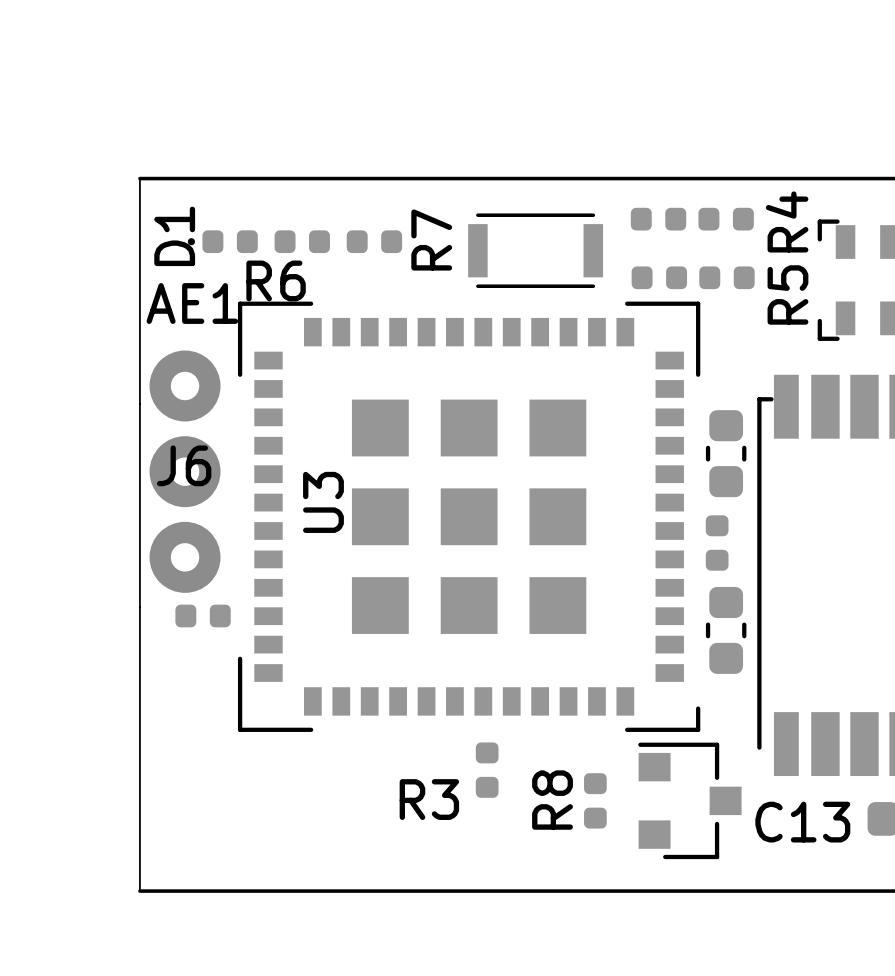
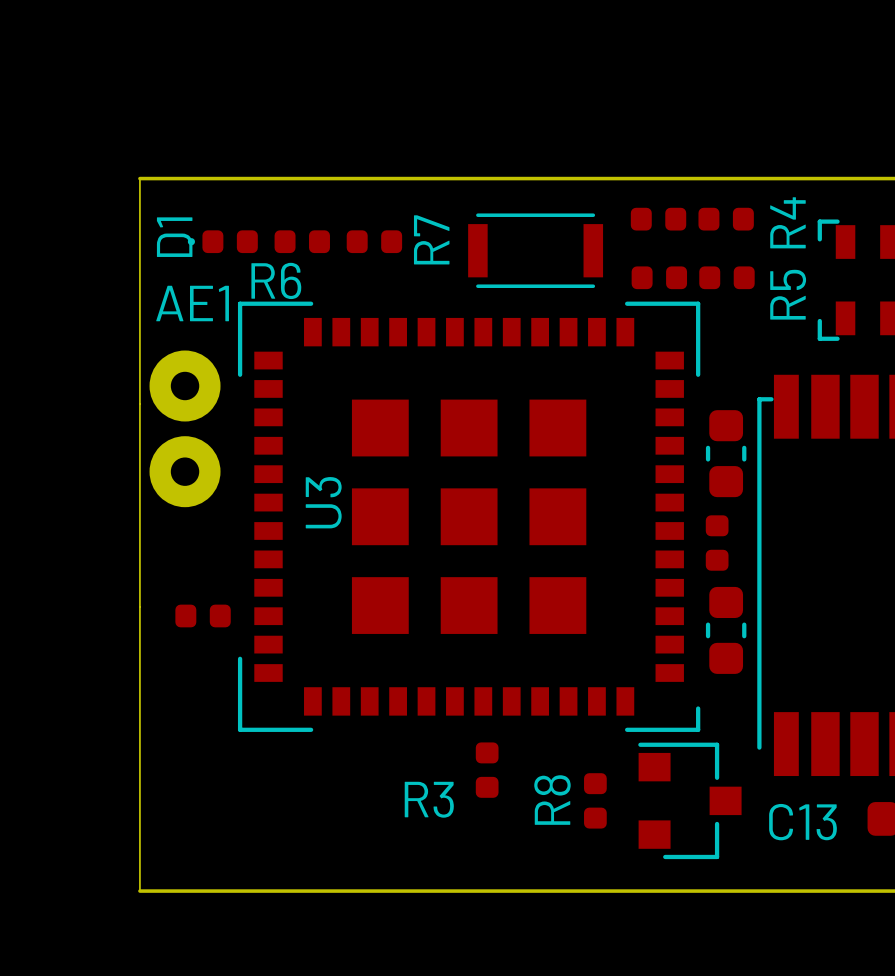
J6: (185, 557) -> none

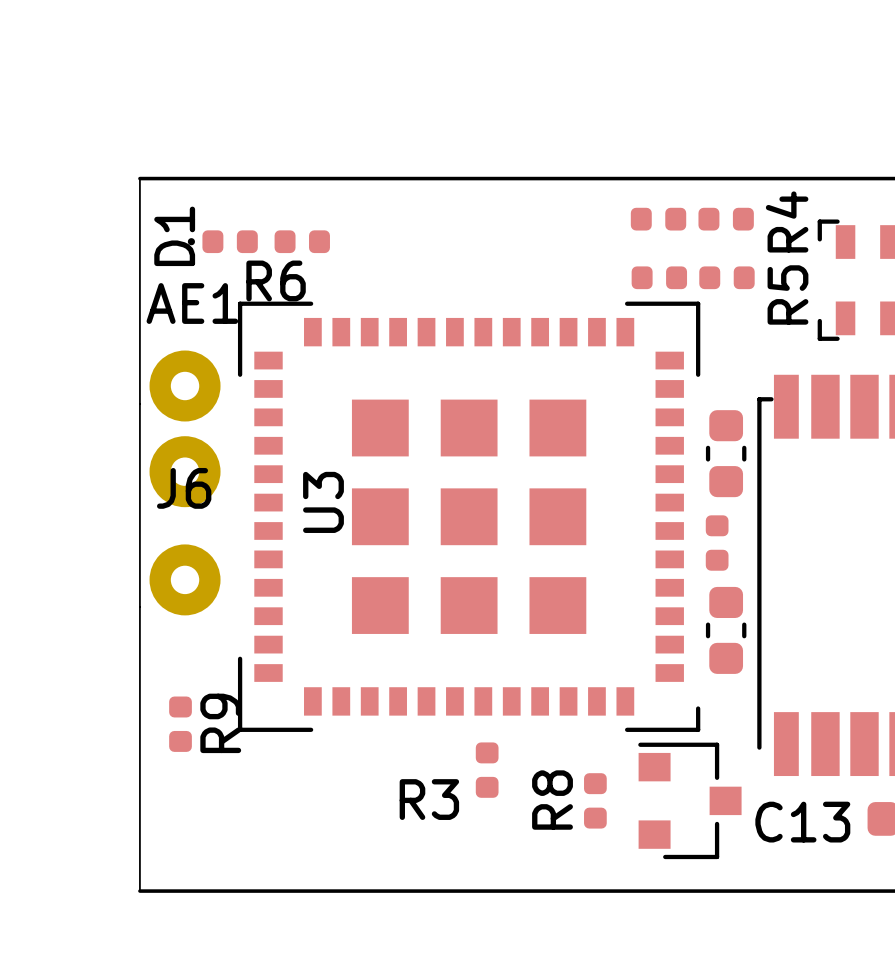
R7: (374, 241) -> none
part: (535, 250) -> none
J6: none -> (185, 579)
part: (203, 615) -> none
R9: none -> (180, 724)

